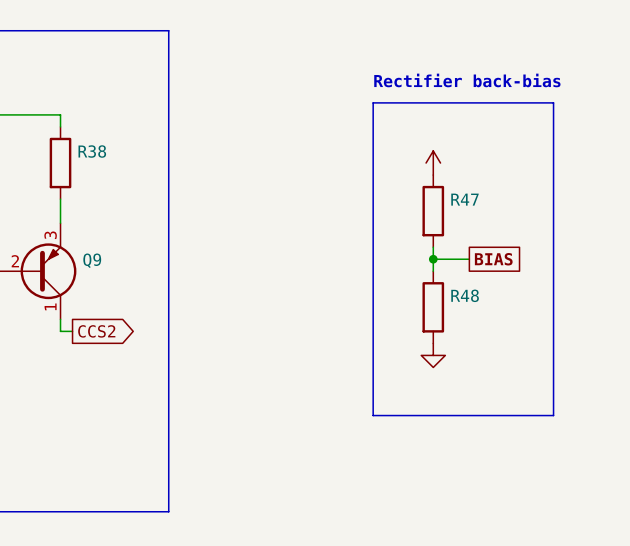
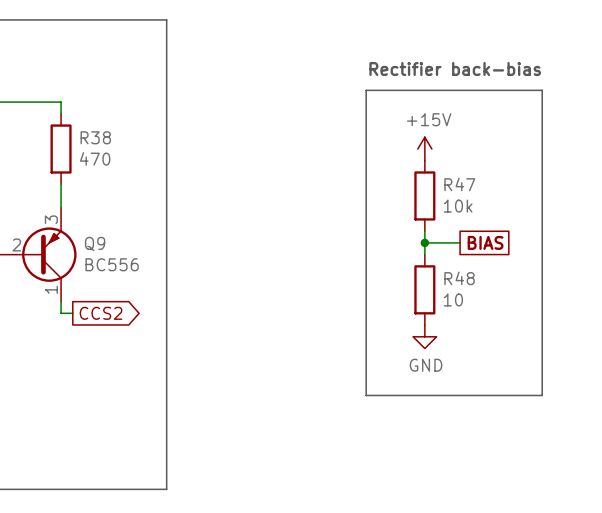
power symbol text: none -> +15V (429, 119)
R38 value: none -> 470 (95, 158)
R47 value: none -> 10k (458, 206)
Q9 value: none -> BC556 (112, 264)
R48 value: none -> 10 (453, 299)
power symbol text: none -> GND (426, 365)

